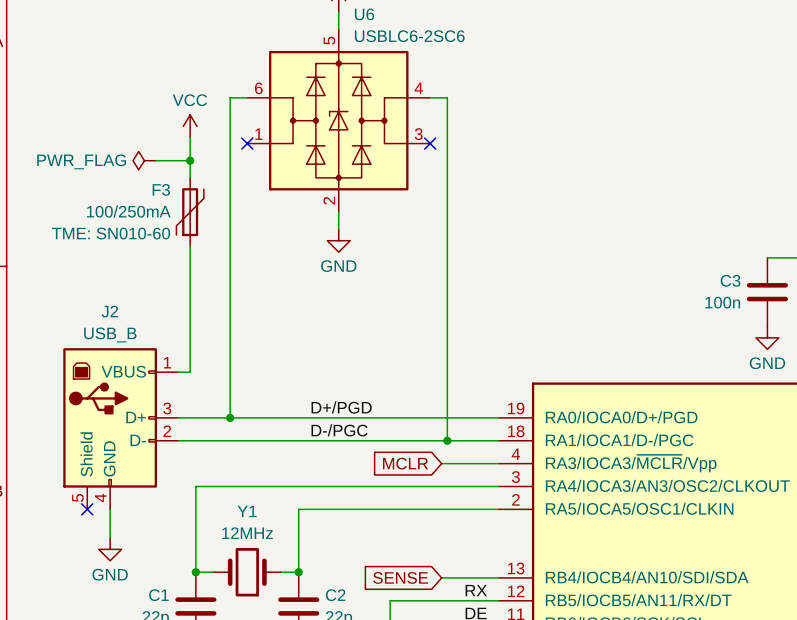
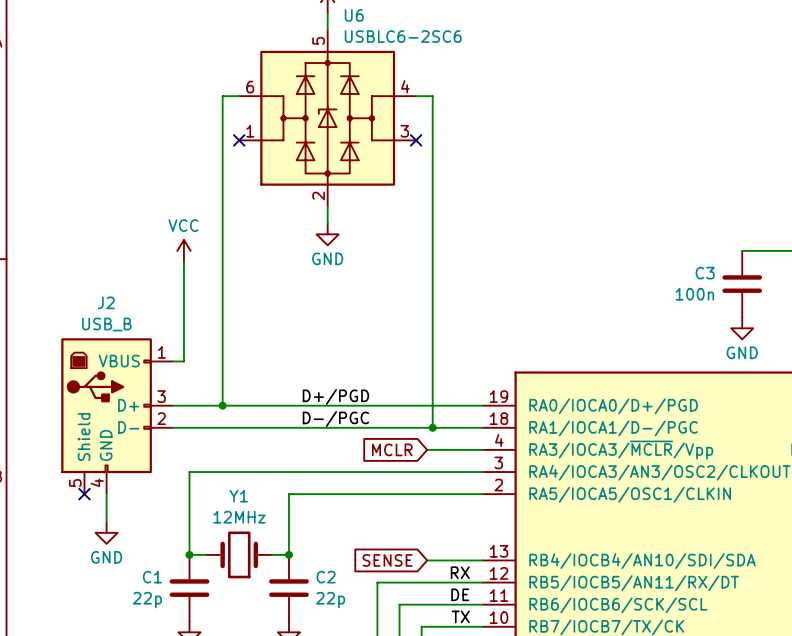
power symbol position: VCC (190, 126) -> VCC (183, 250)
wire: (190, 137) (190, 177) -> none
power symbol: PWR_FLAG (144, 160) -> none
wire: (155, 160) (190, 160) -> none
junction: (190, 160) -> none
F3: 100/250mA (190, 212) -> none

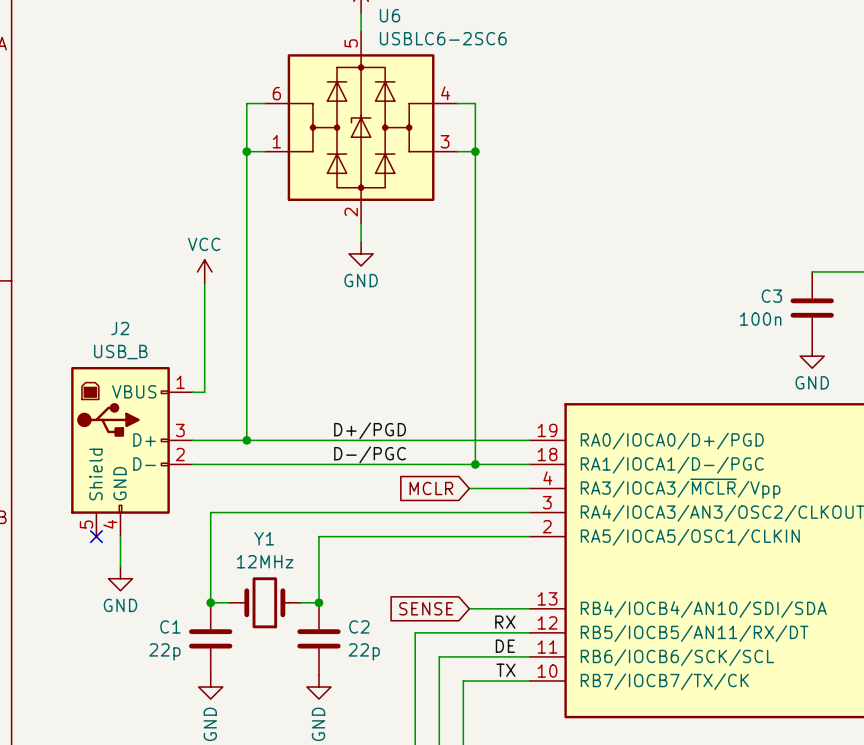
wire: none -> (246, 151) (264, 151)
junction: none -> (246, 151)
no-connect mark: (239, 140) -> none
wire: none -> (457, 151) (475, 151)
no-connect mark: (416, 140) -> none
junction: none -> (475, 151)

